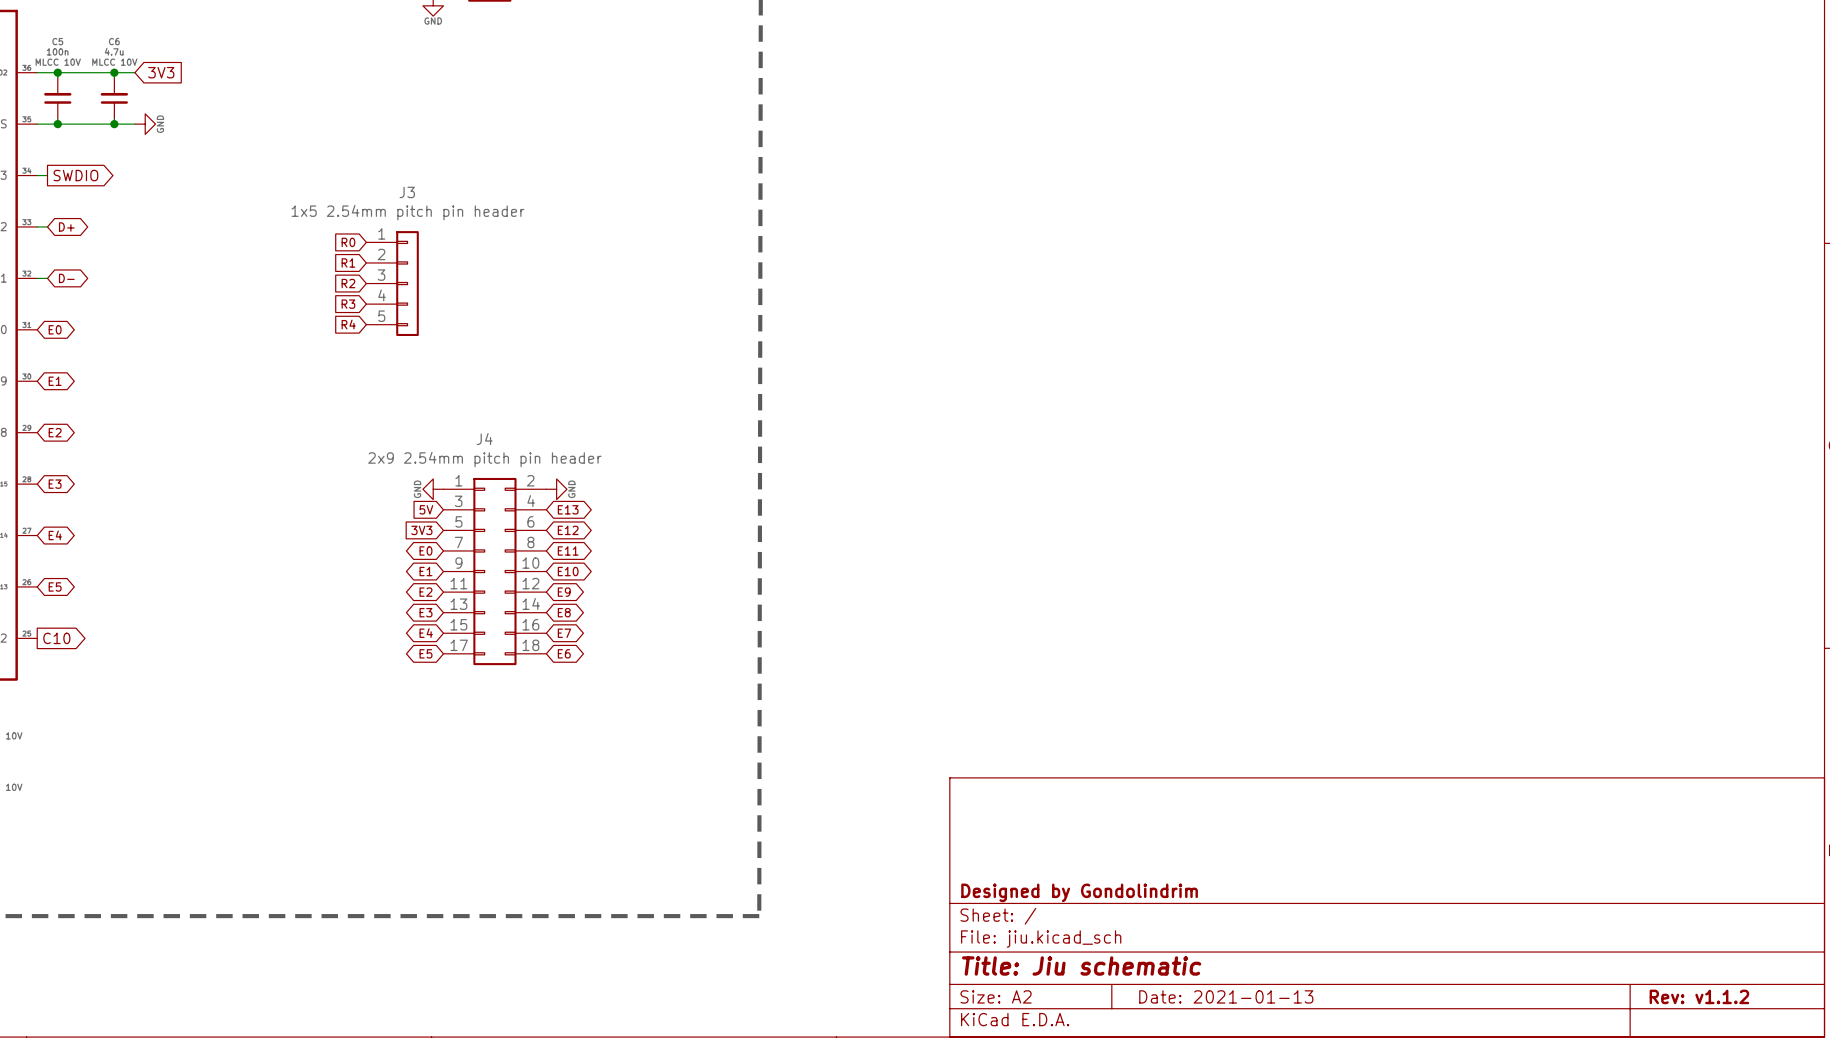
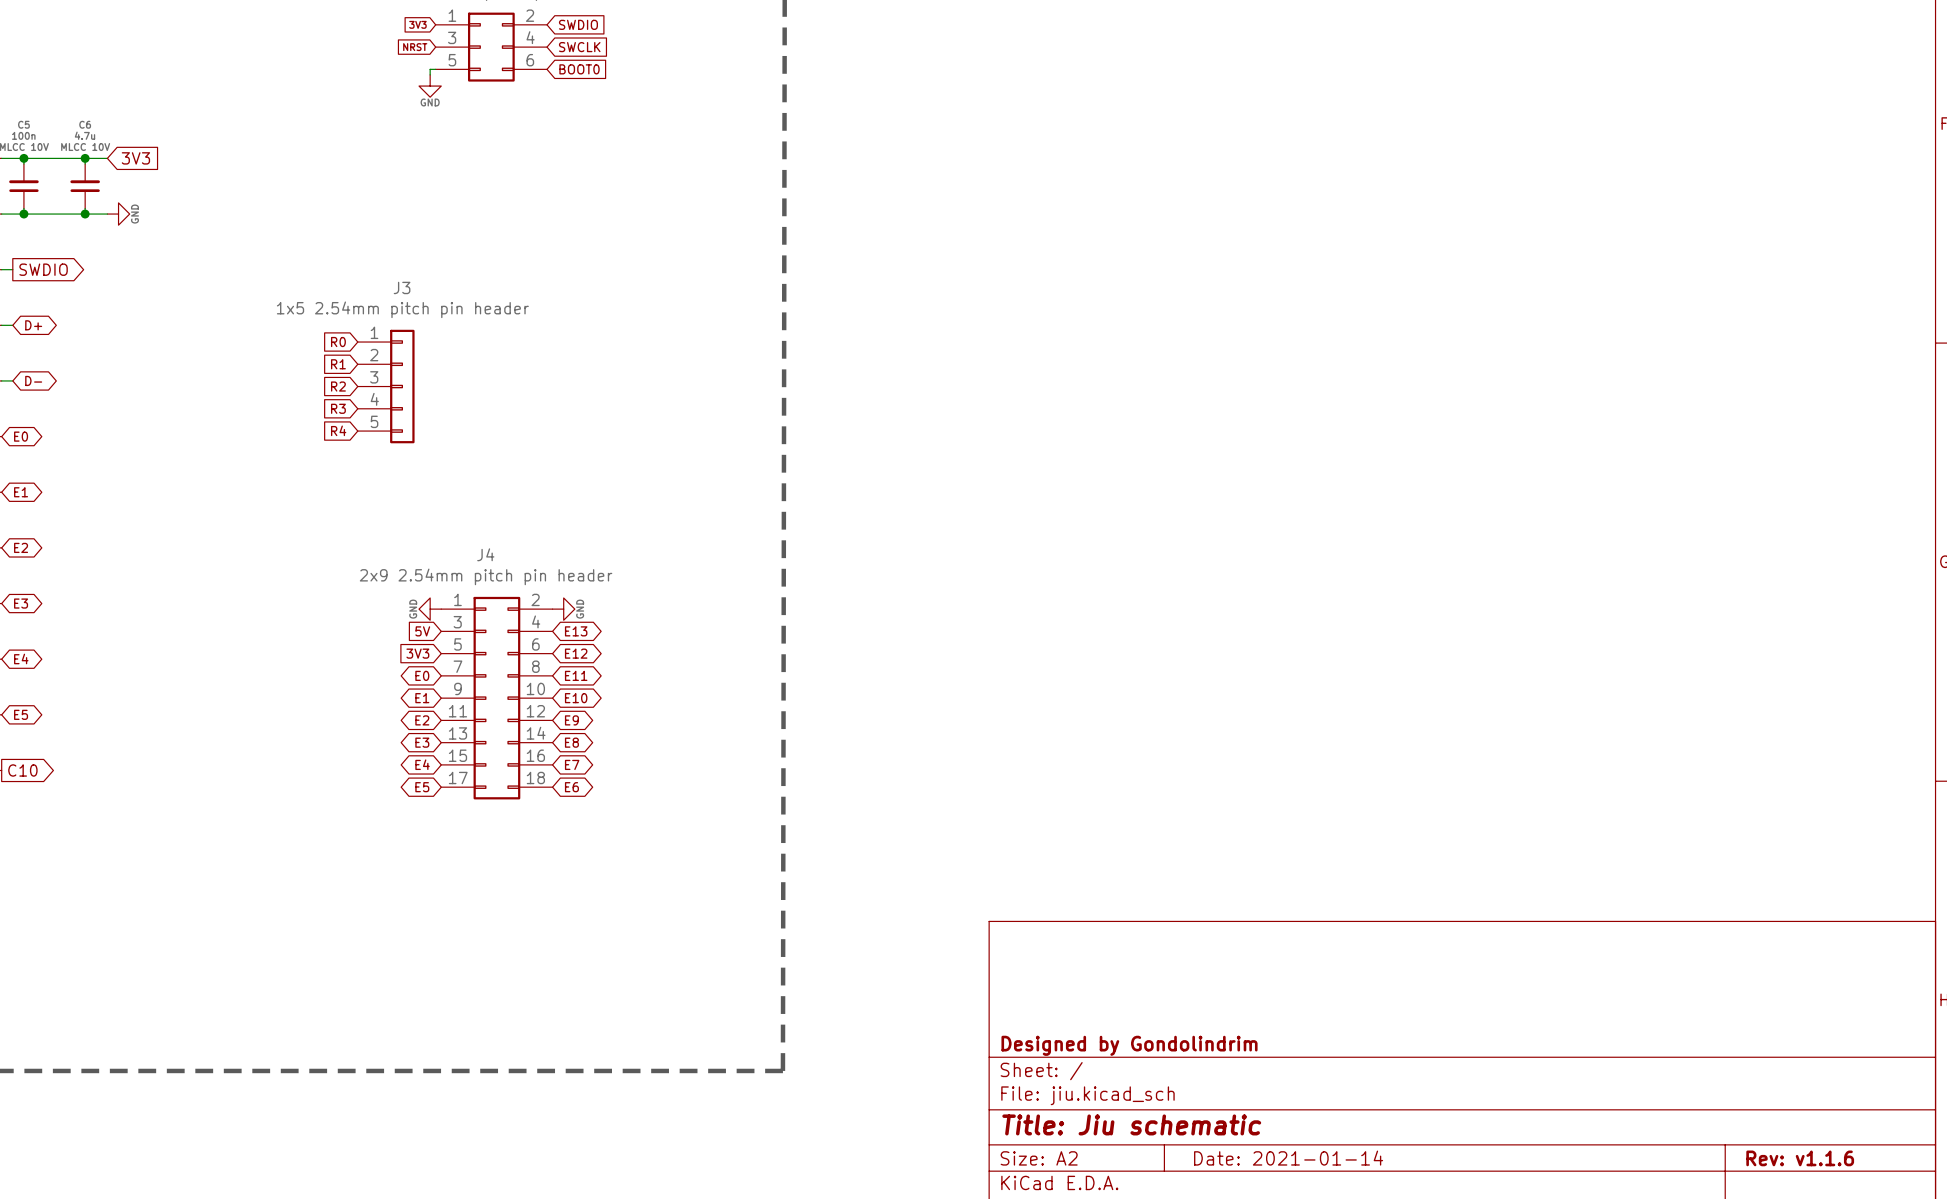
title block: Date: 2021-01-13 (1226, 996) -> Date: 2021-01-14 (1288, 1158)
title block: Rev: v1.1.2 (1699, 996) -> Rev: v1.1.6 (1800, 1158)

